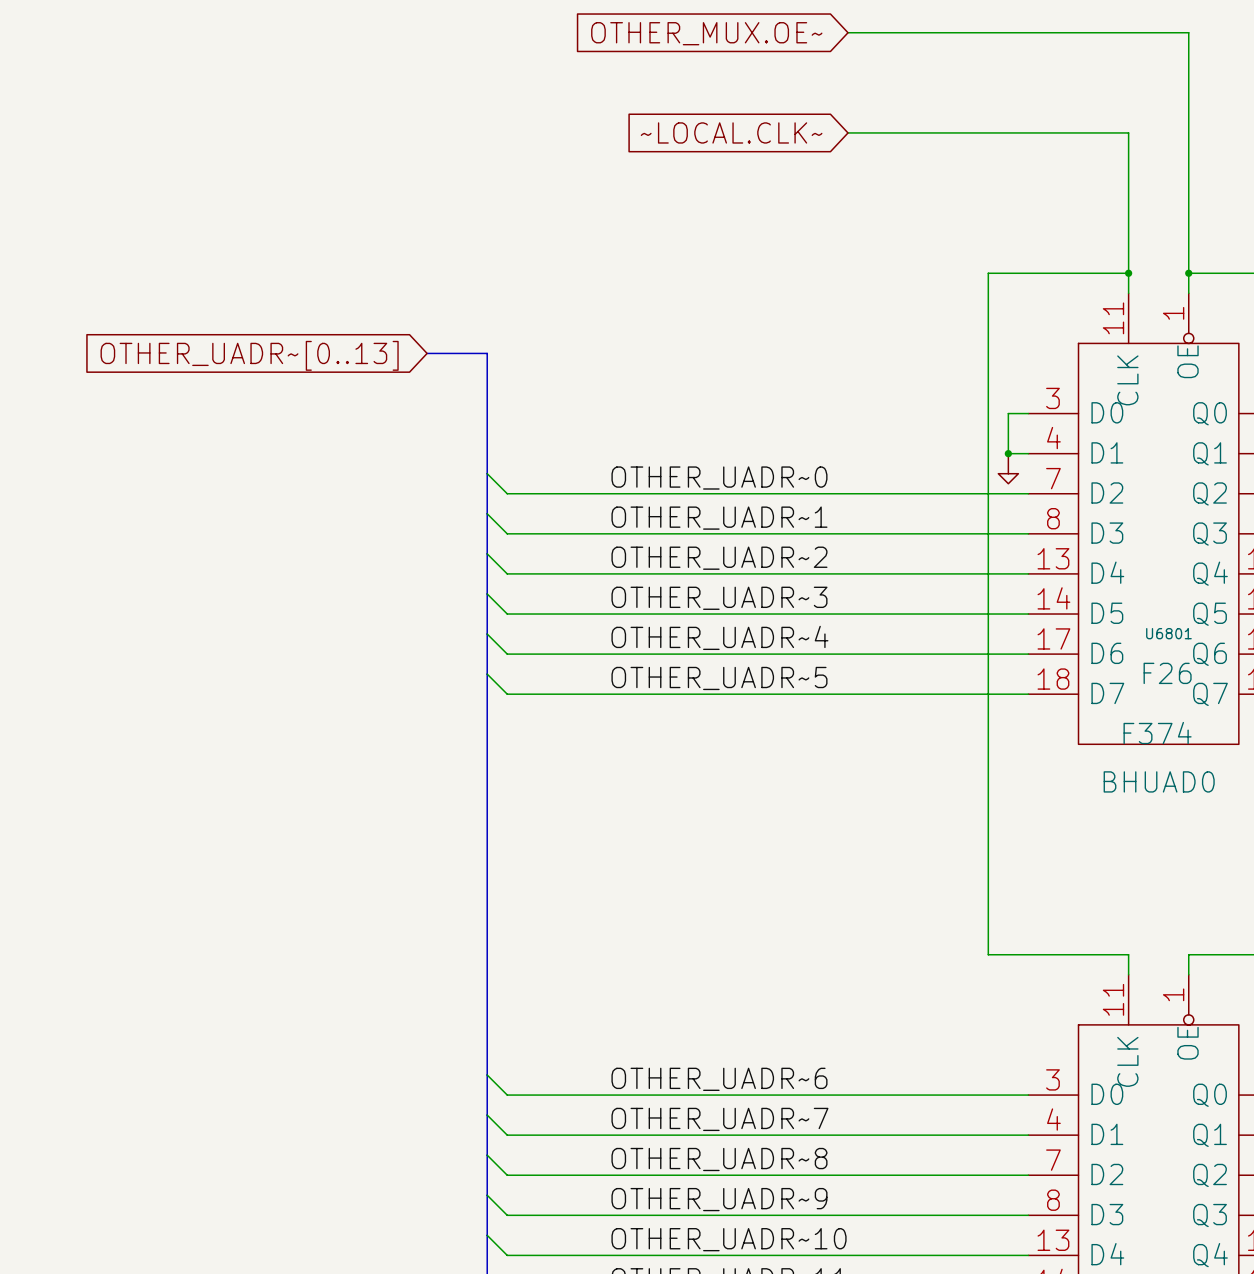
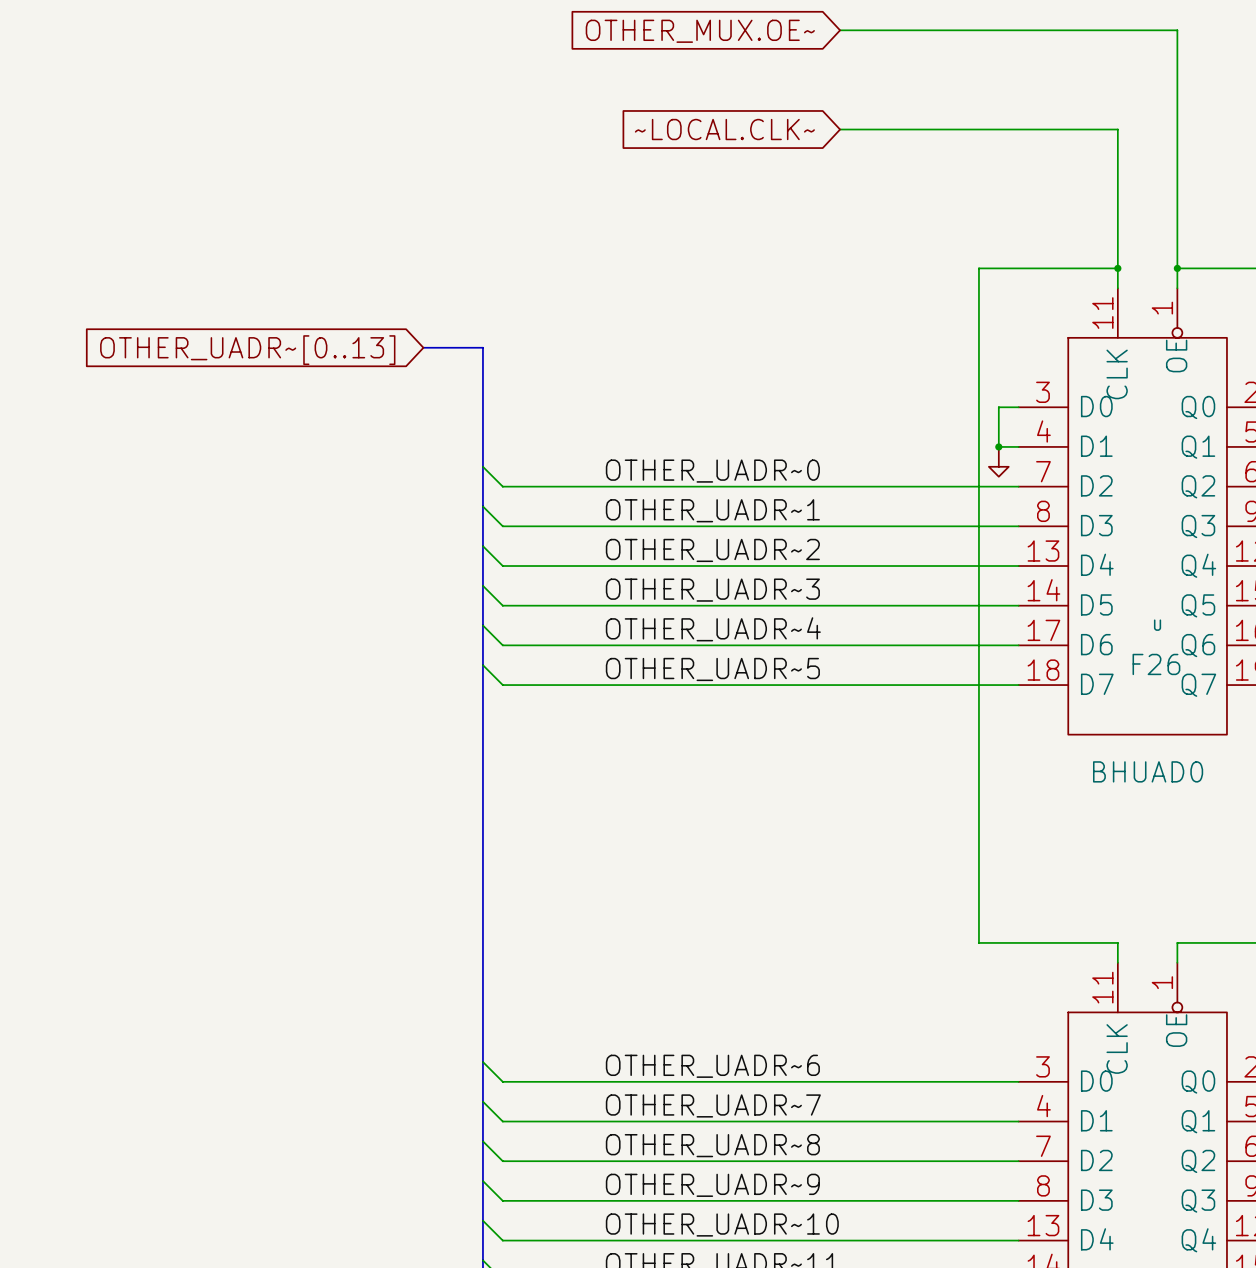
U6801 name: U6801 (1168, 633) -> U (1157, 625)
U6801 value: F374 (1157, 733) -> none

